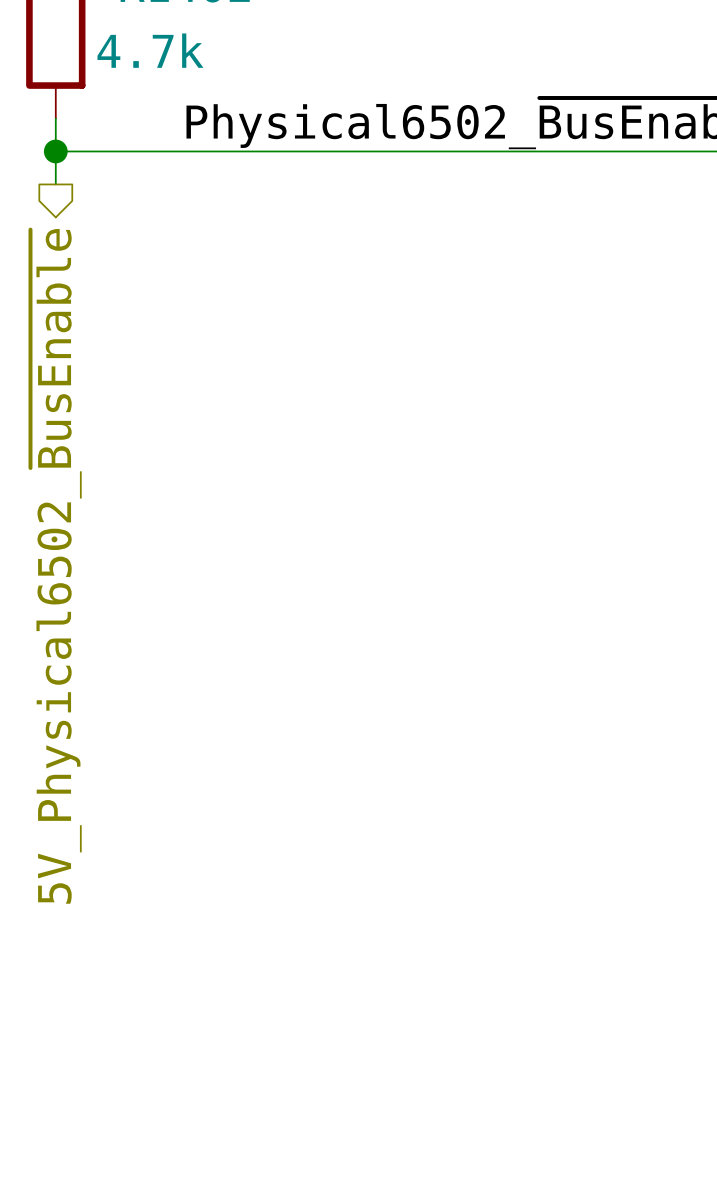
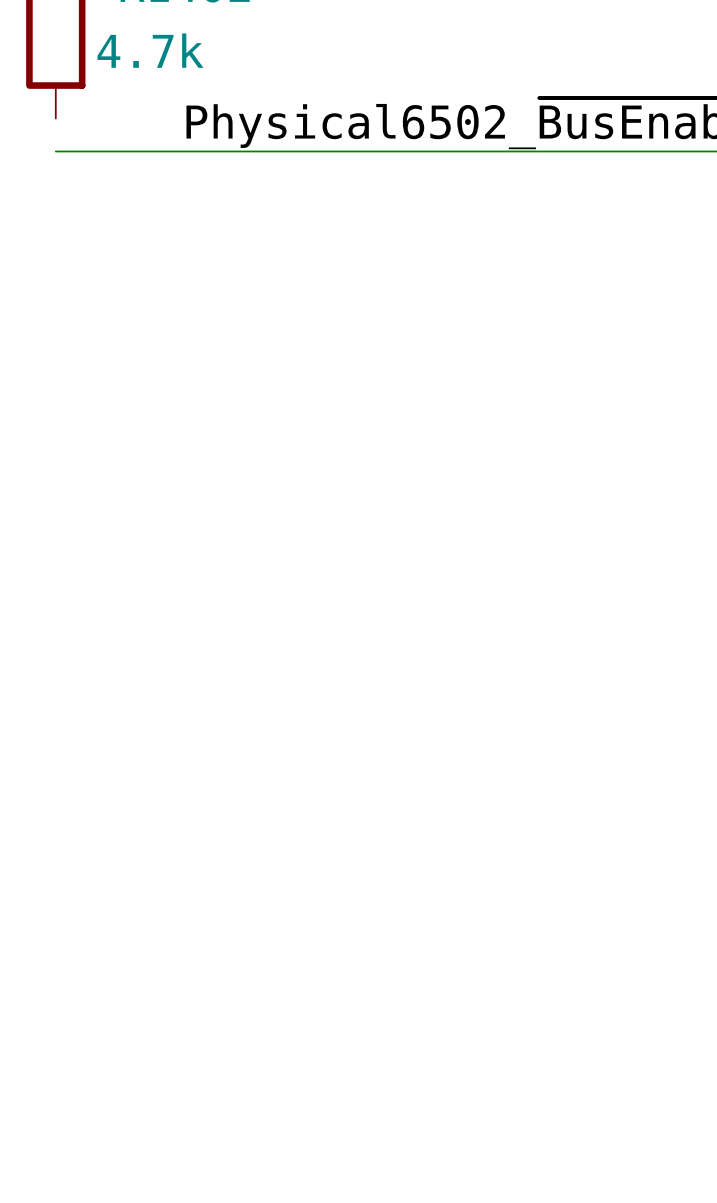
wire: (55, 118) (55, 184) -> none
junction: (55, 151) -> none
hierarchical label: 5V_Physical6502_~{BusEnable} (56, 566) -> none

